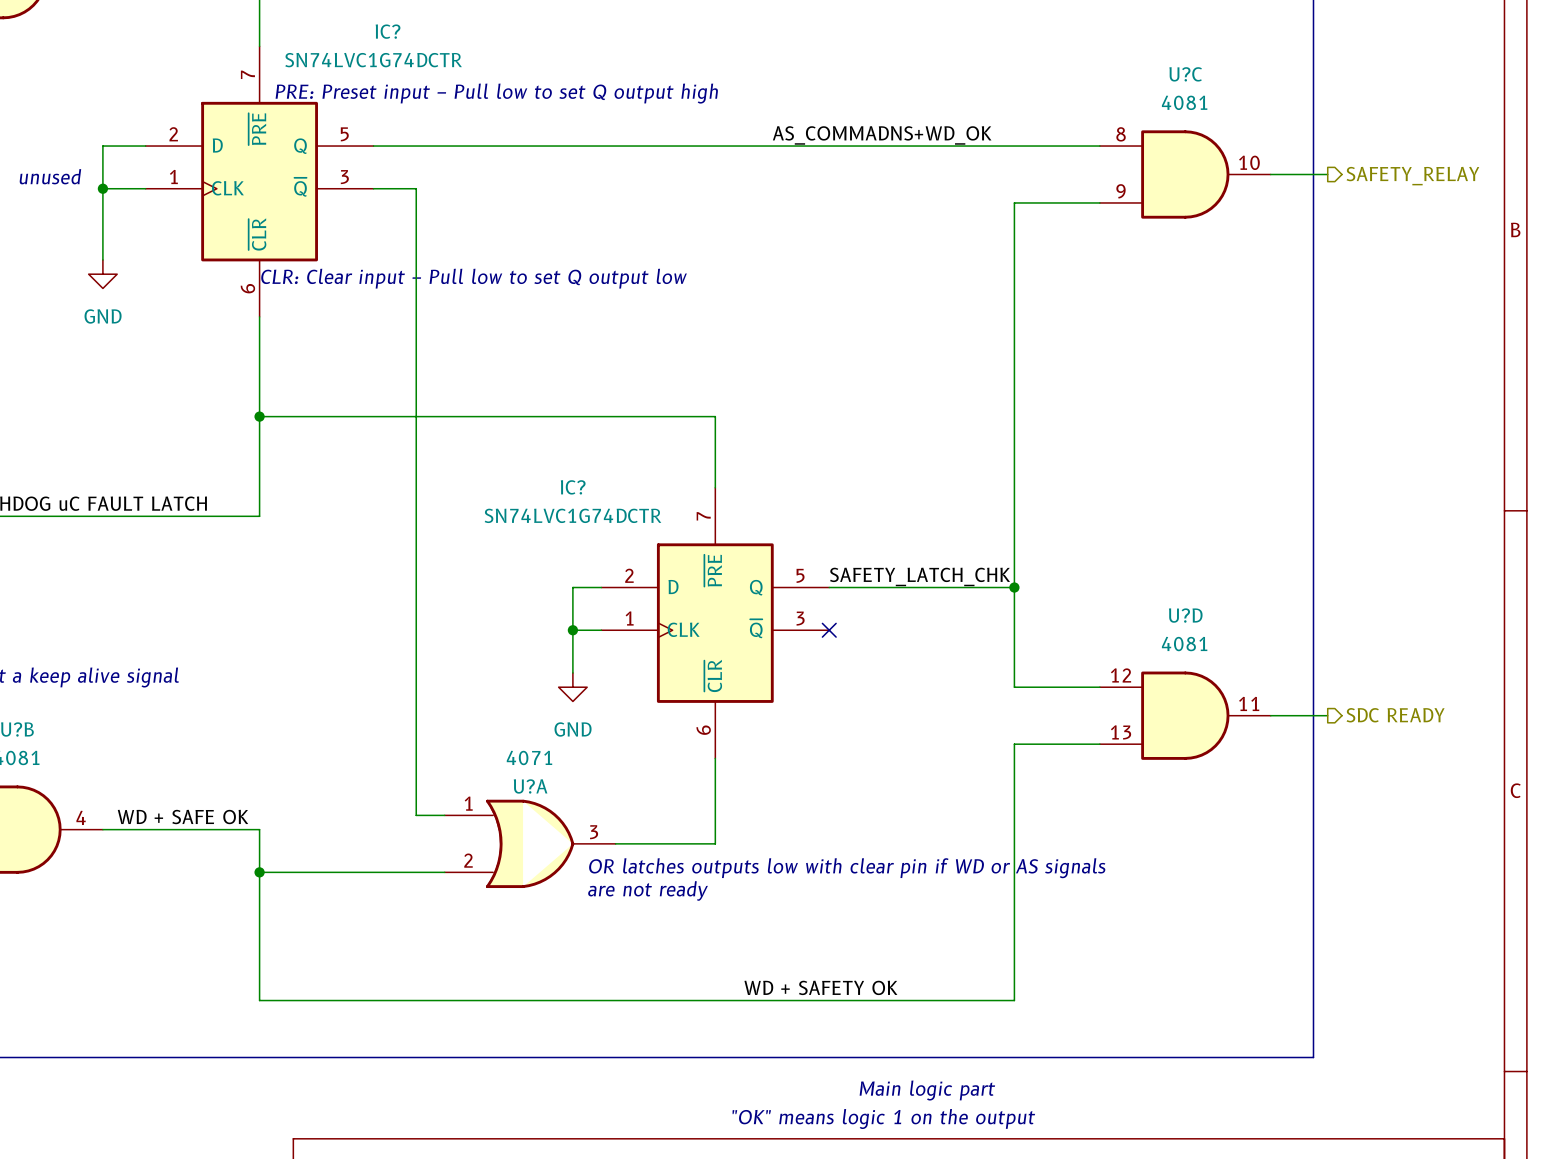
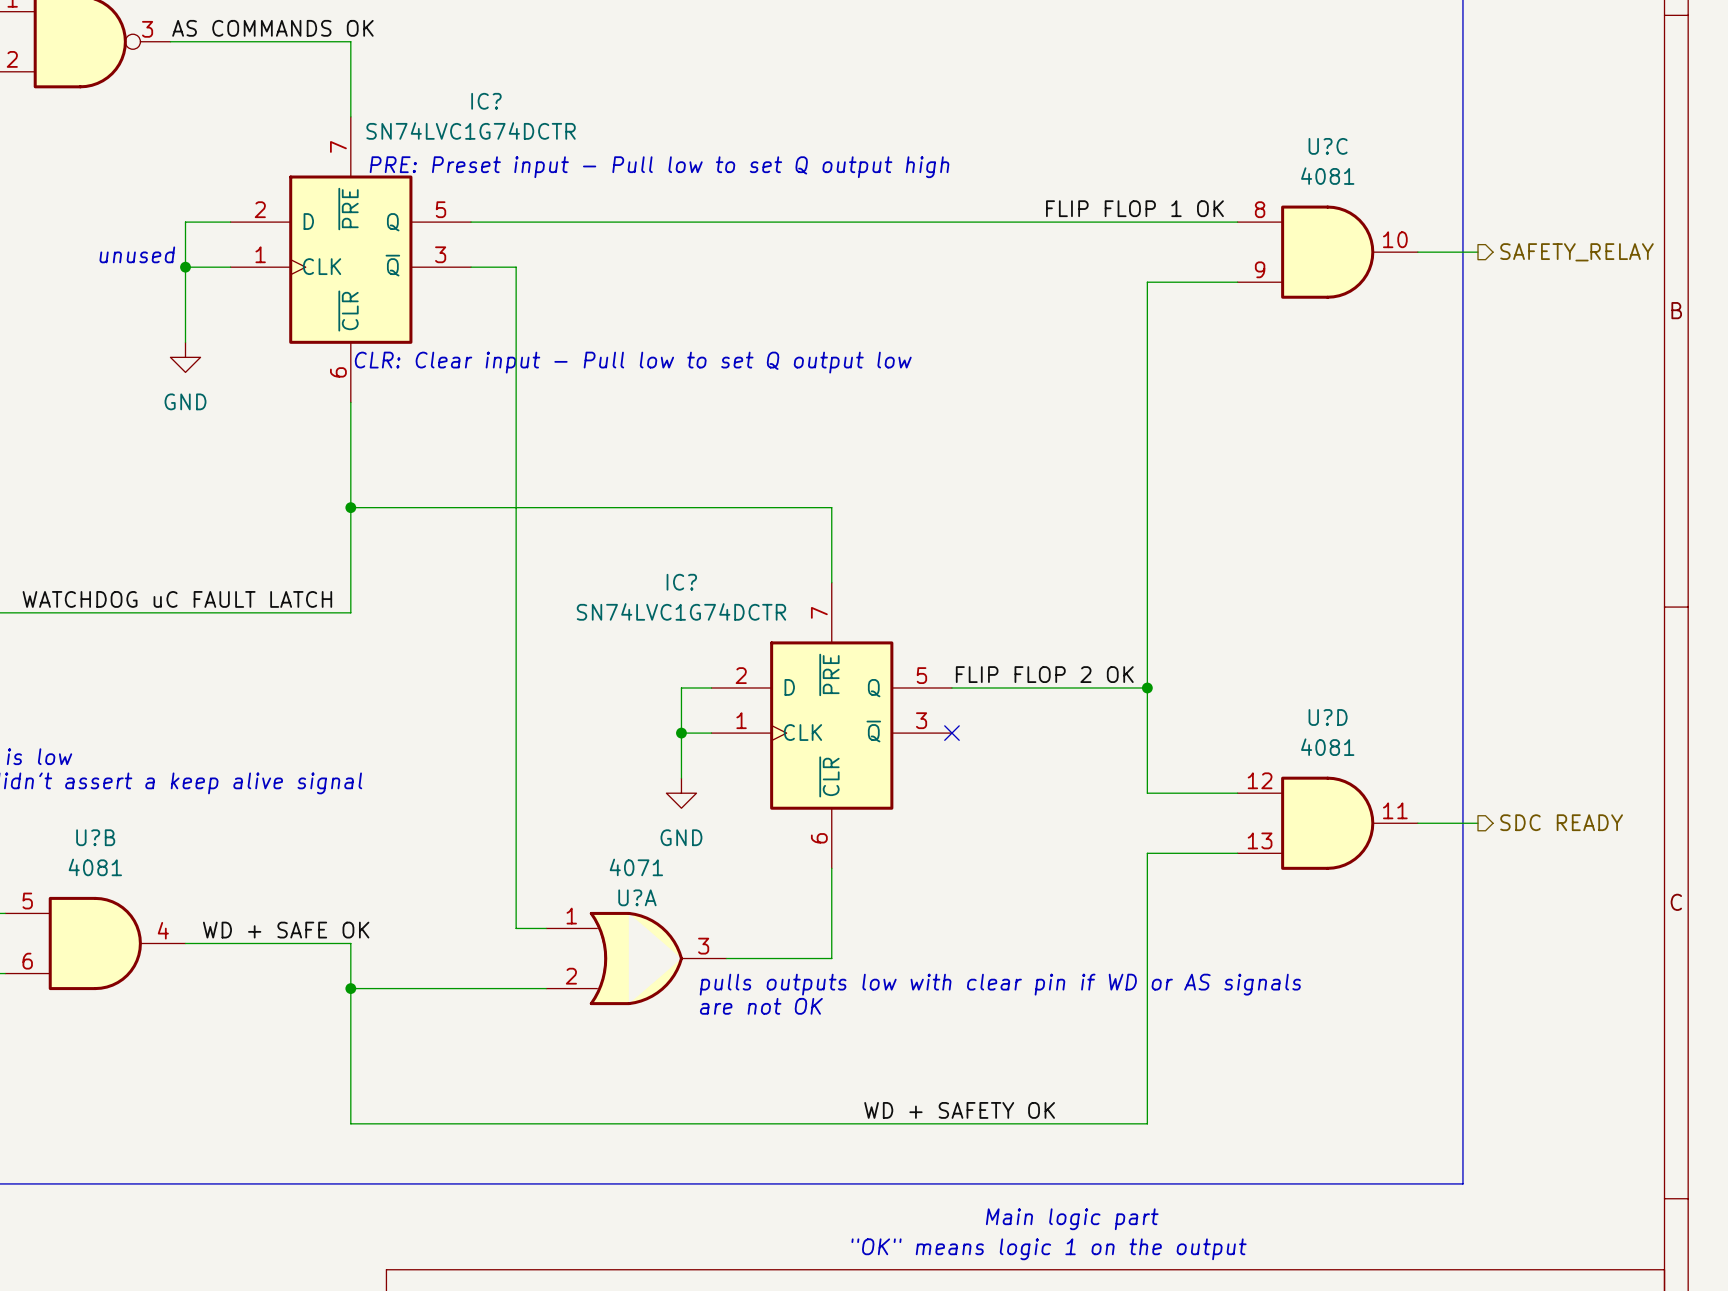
label: none -> FLIP FLOP 1 OK (1134, 208)
label: AS_COMMADNS+WD_OK (882, 135) -> none
label: SAFETY_LATCH_CHK (920, 576) -> FLIP FLOP 2 OK (1044, 674)
text: OR latches outputs low with clear pin if WD or AS signals (847, 868) -> pulls outputs low with clear pin if WD or AS signals (1000, 984)
text: are not ready (648, 890) -> are not OK (761, 1006)

